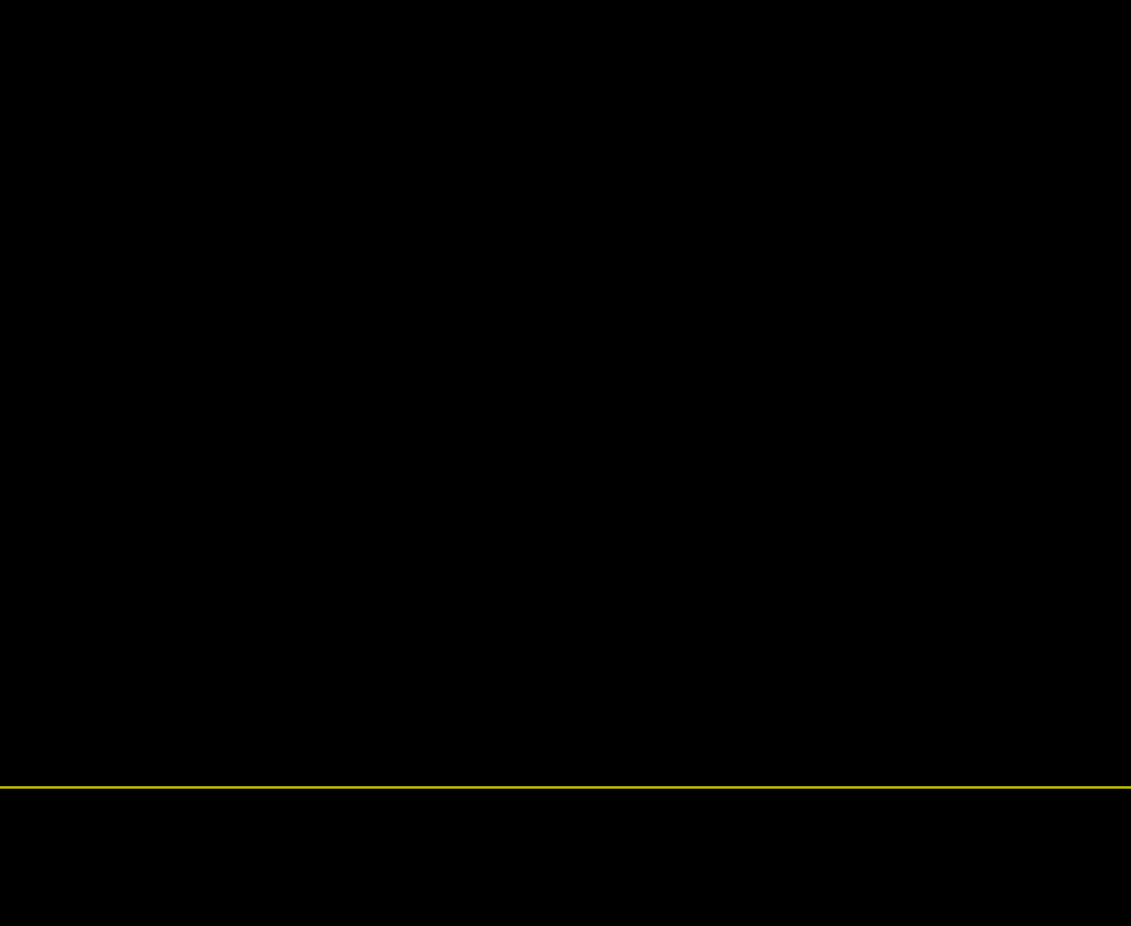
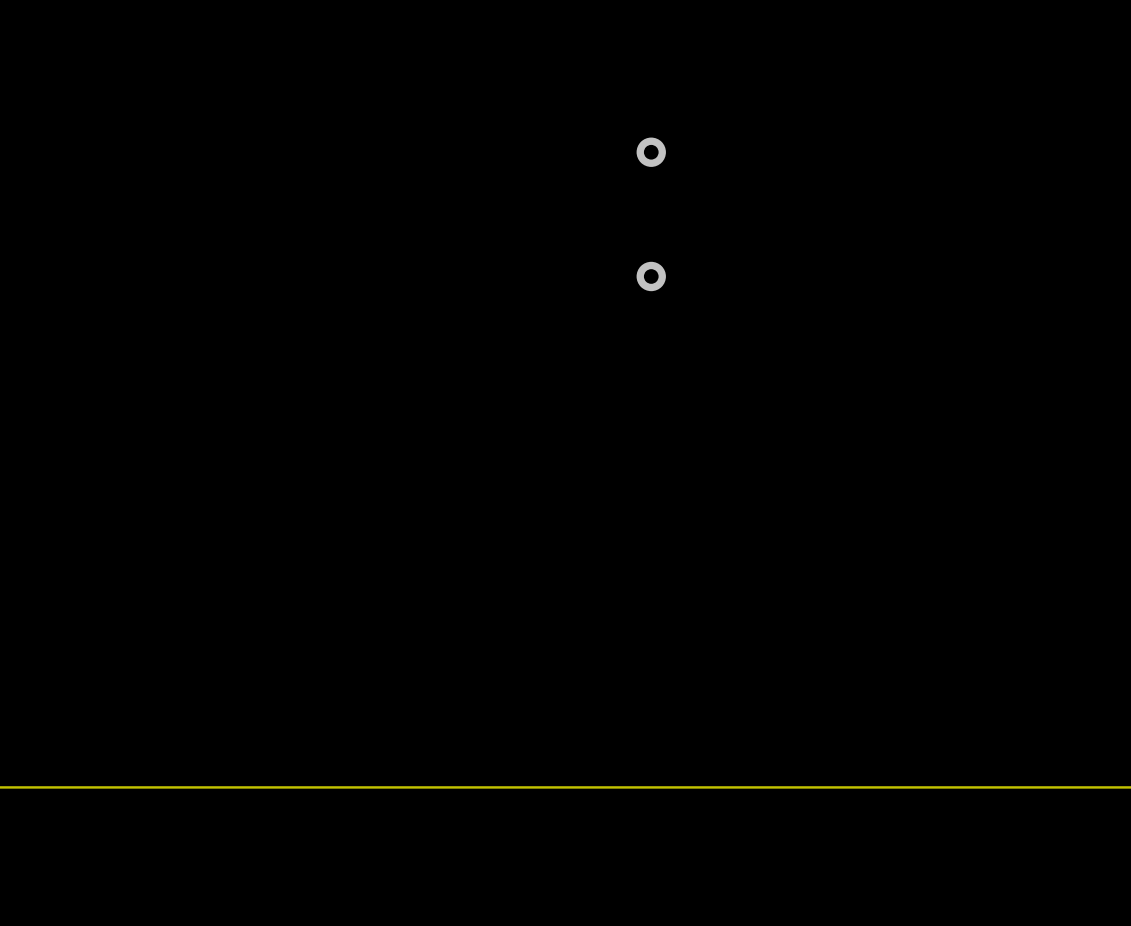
via: none -> (651, 152)
via: none -> (651, 276)

